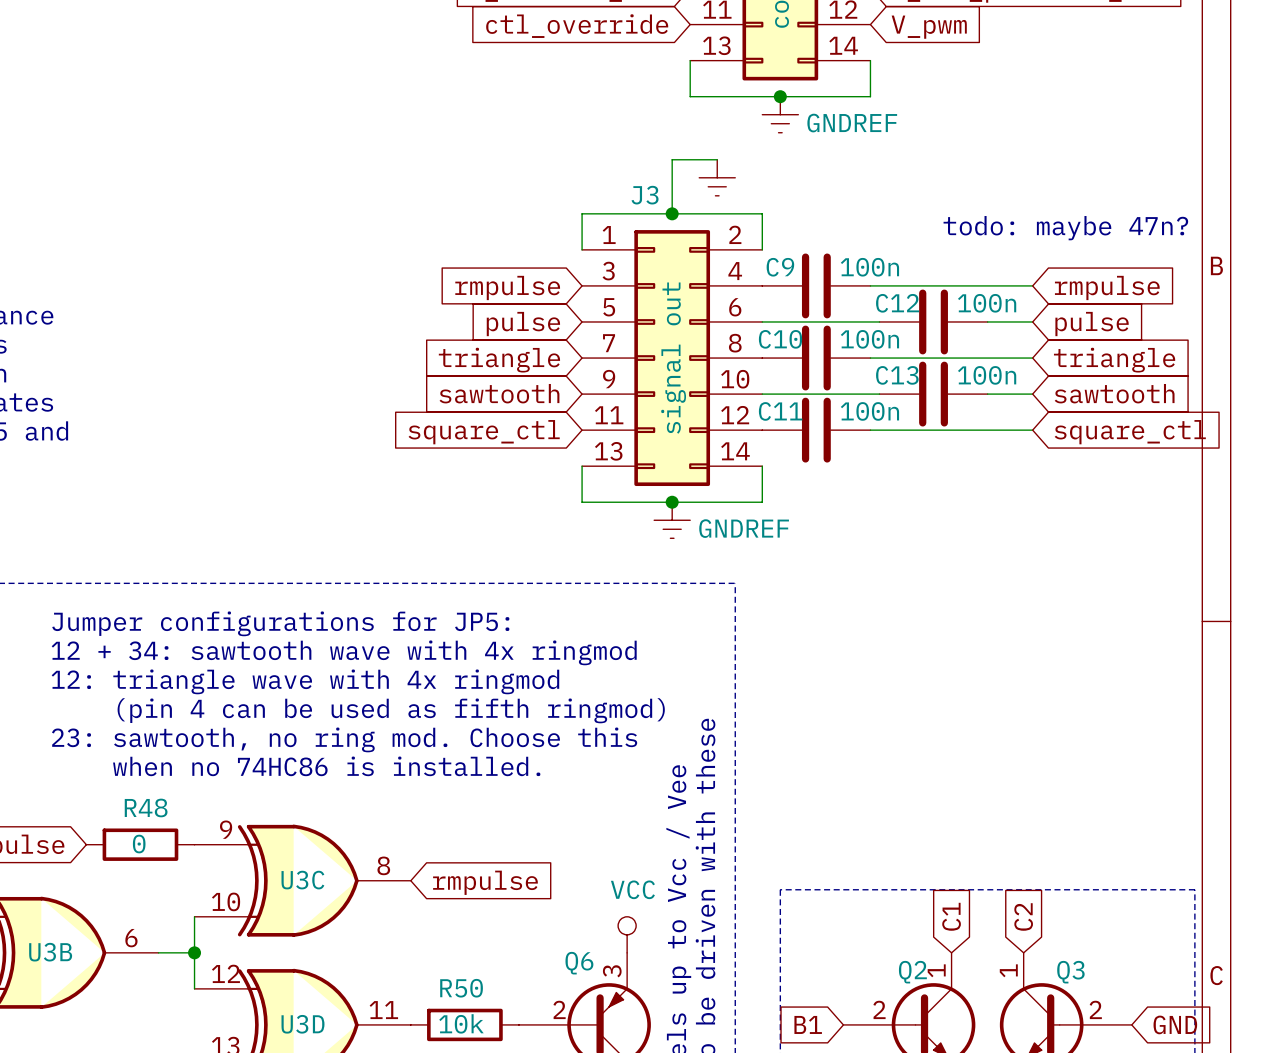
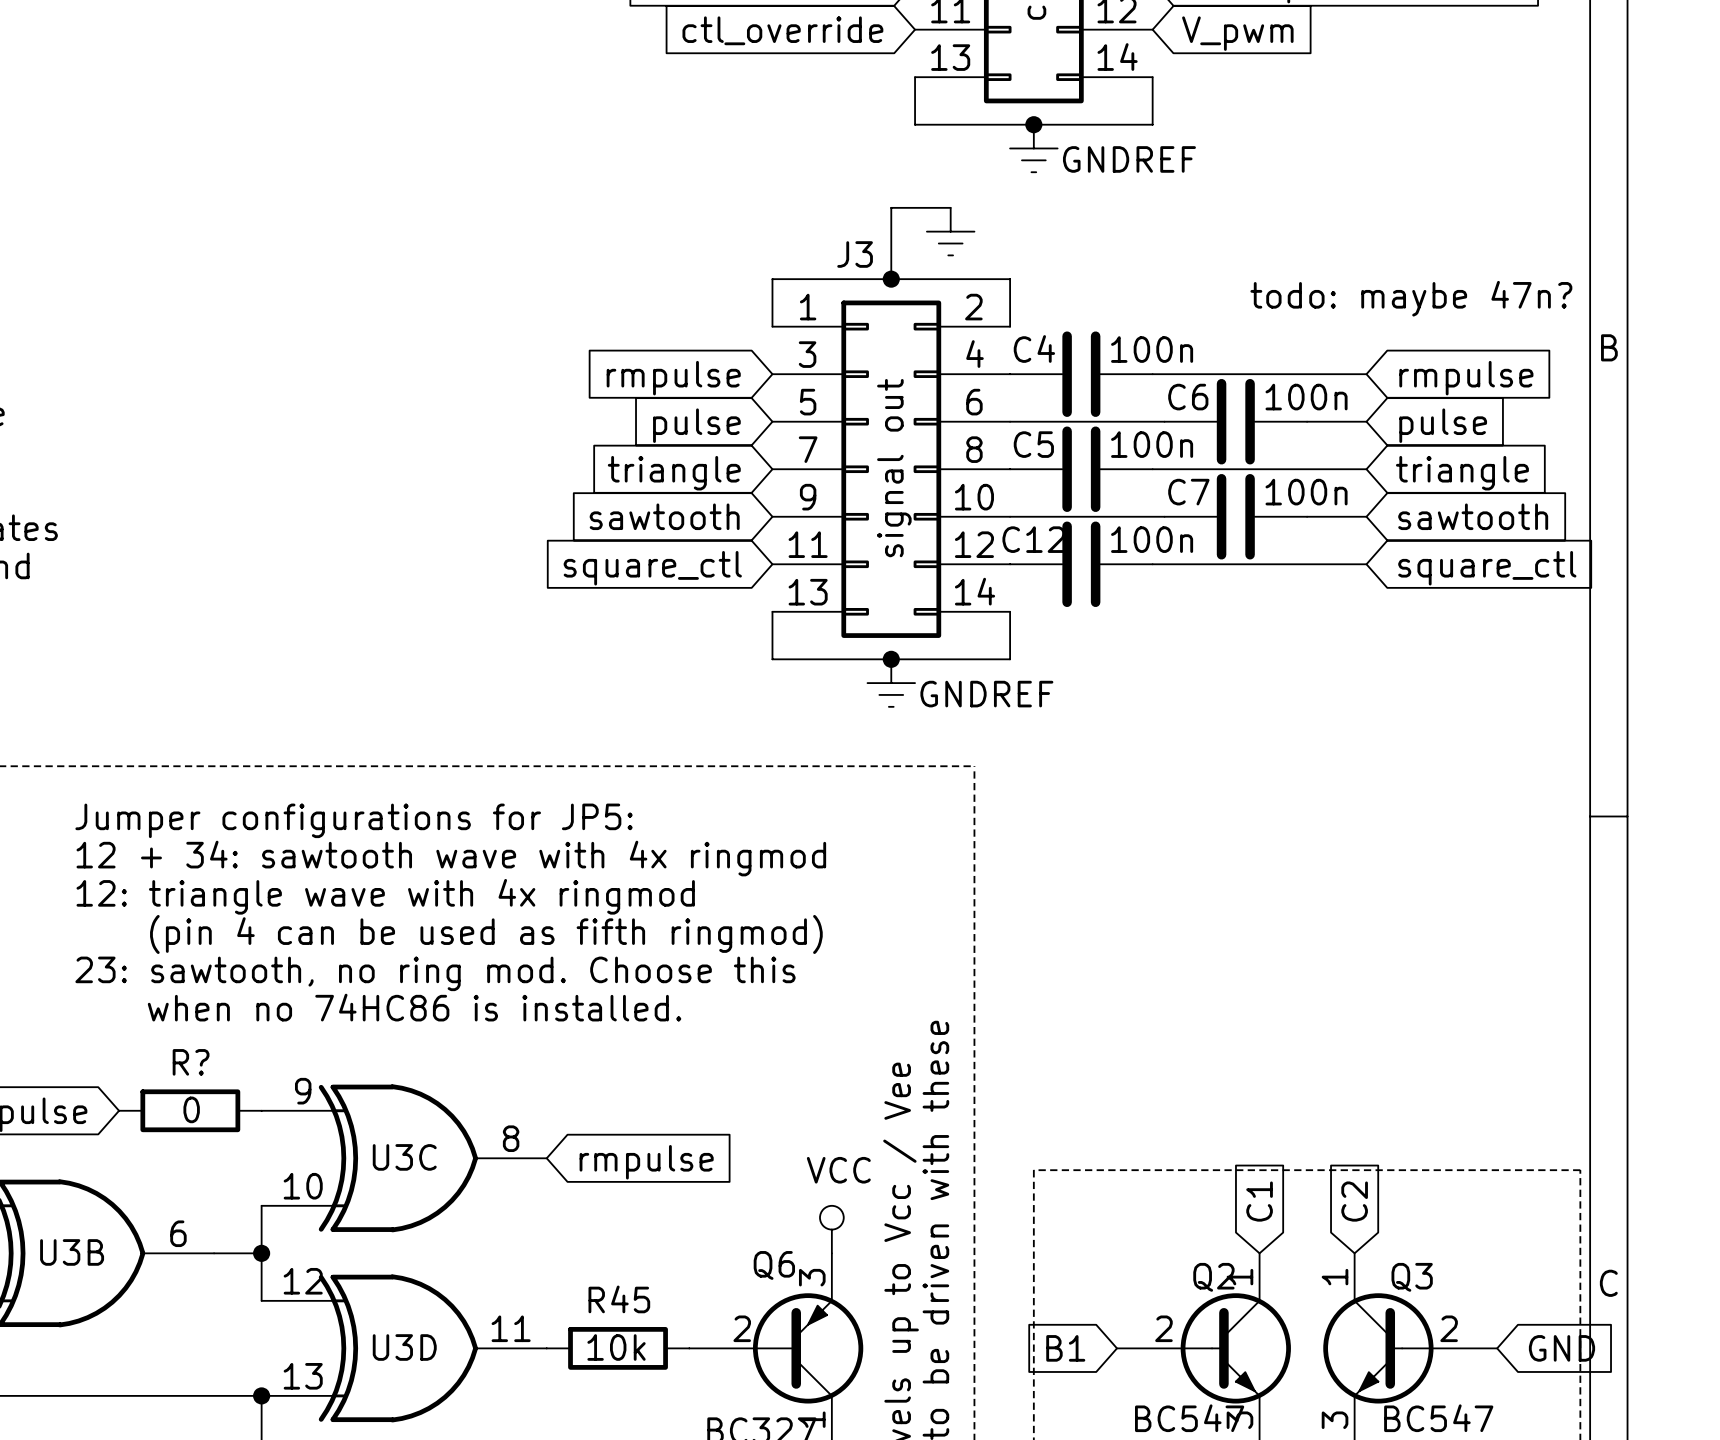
C9 name: C9 (780, 267) -> C4 (1034, 348)
C12 name: C12 (897, 303) -> C6 (1188, 397)
C10 name: C10 (780, 339) -> C5 (1033, 444)
C13 name: C13 (897, 375) -> C7 (1188, 492)
C11 name: C11 (780, 411) -> C12 (1033, 539)
R48 name: R48 (146, 807) -> R? (191, 1062)
R50 name: R50 (461, 988) -> R45 (619, 1299)

